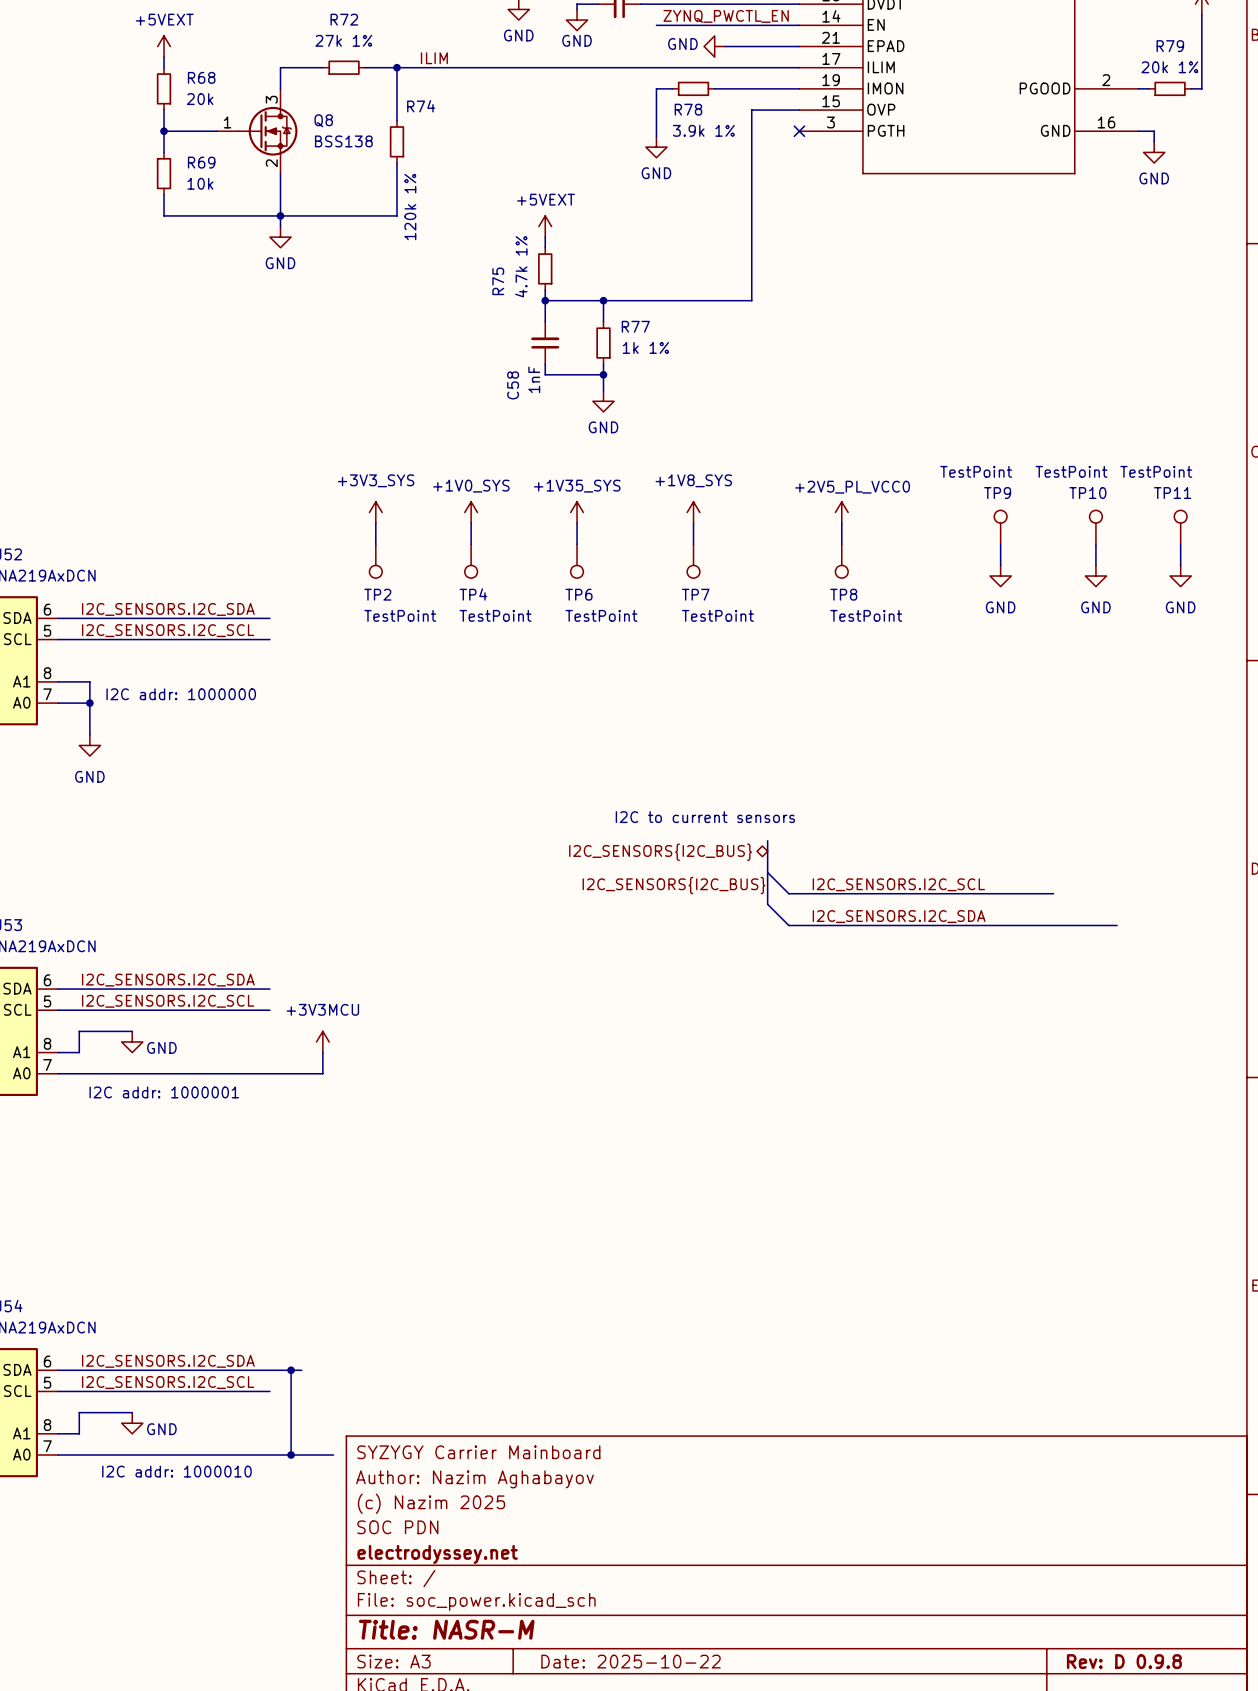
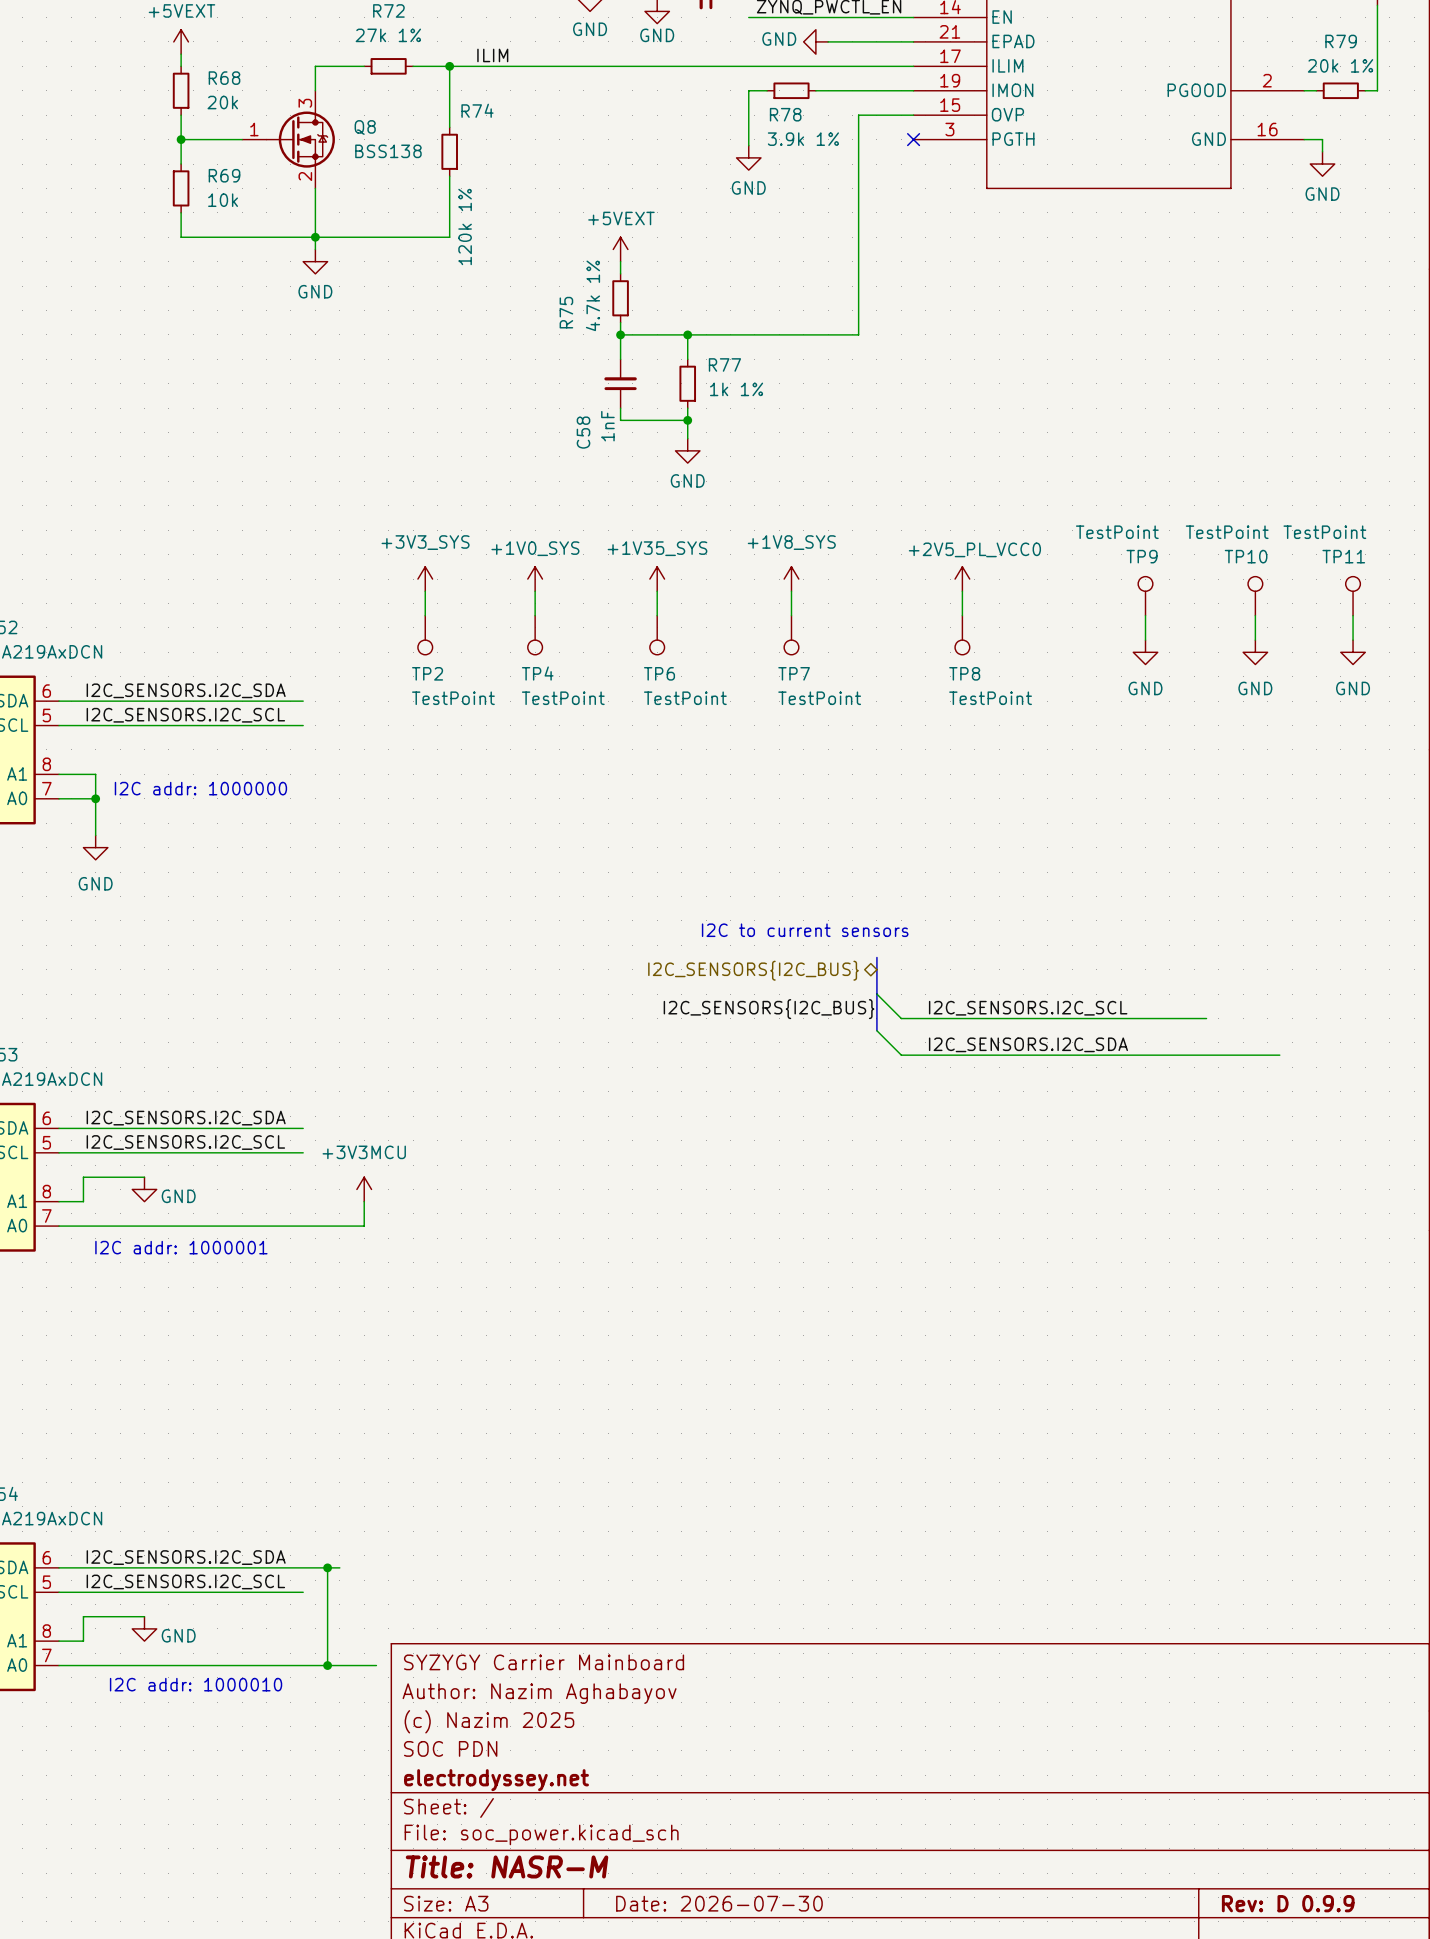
title block: Date: 2025-10-22 (631, 1661) -> Date: 2026-07-30 (719, 1903)
title block: Rev: D 0.9.8 (1124, 1661) -> Rev: D 0.9.9 (1288, 1903)

